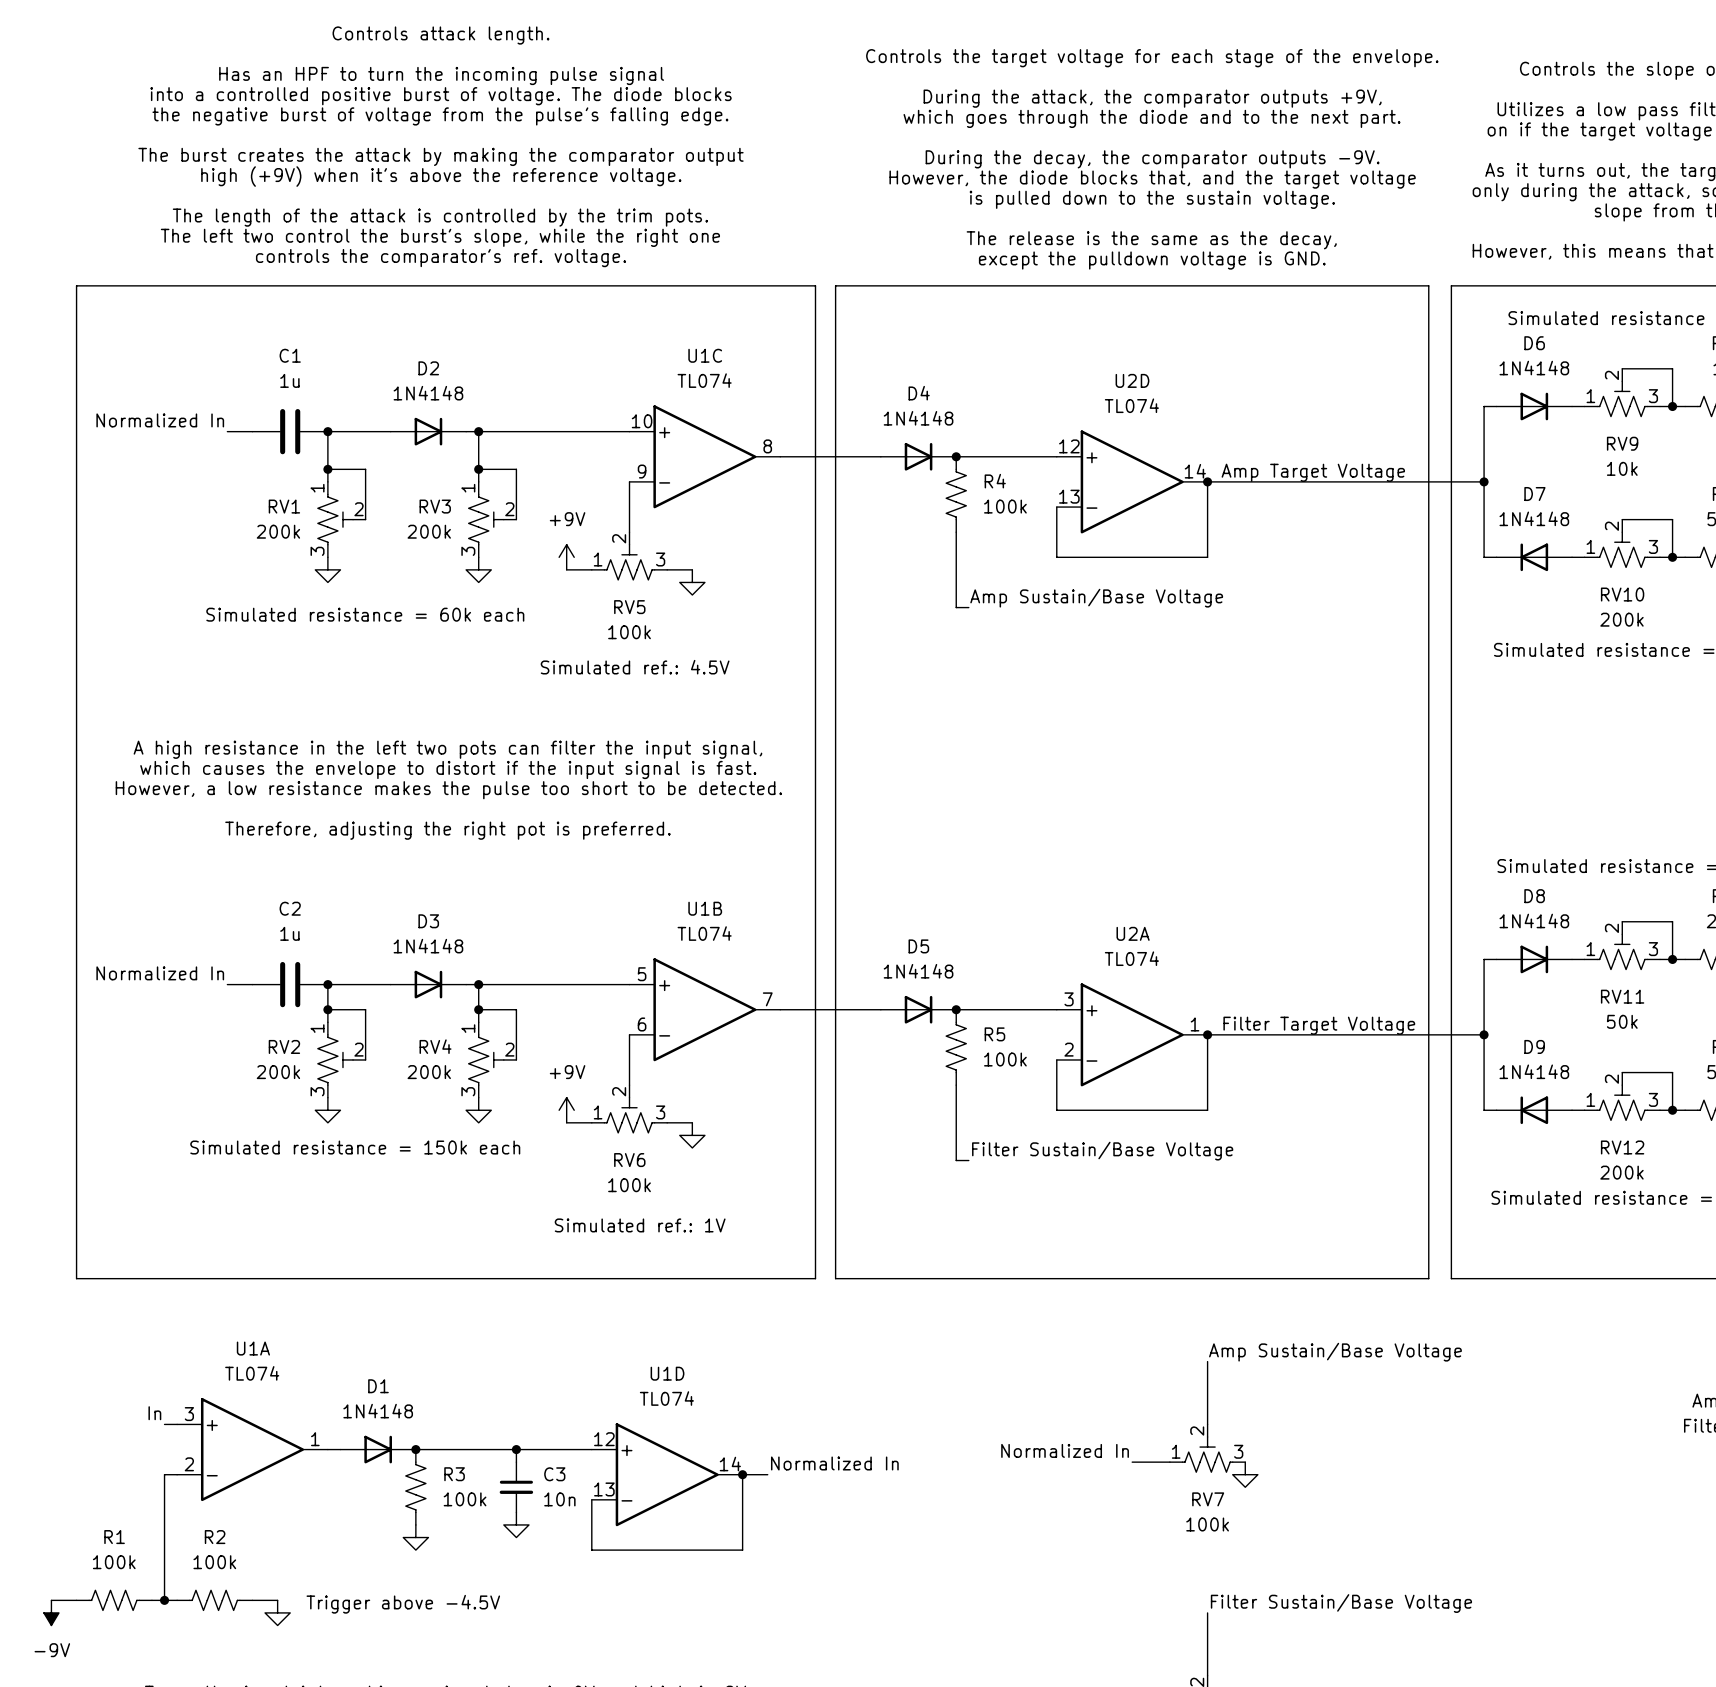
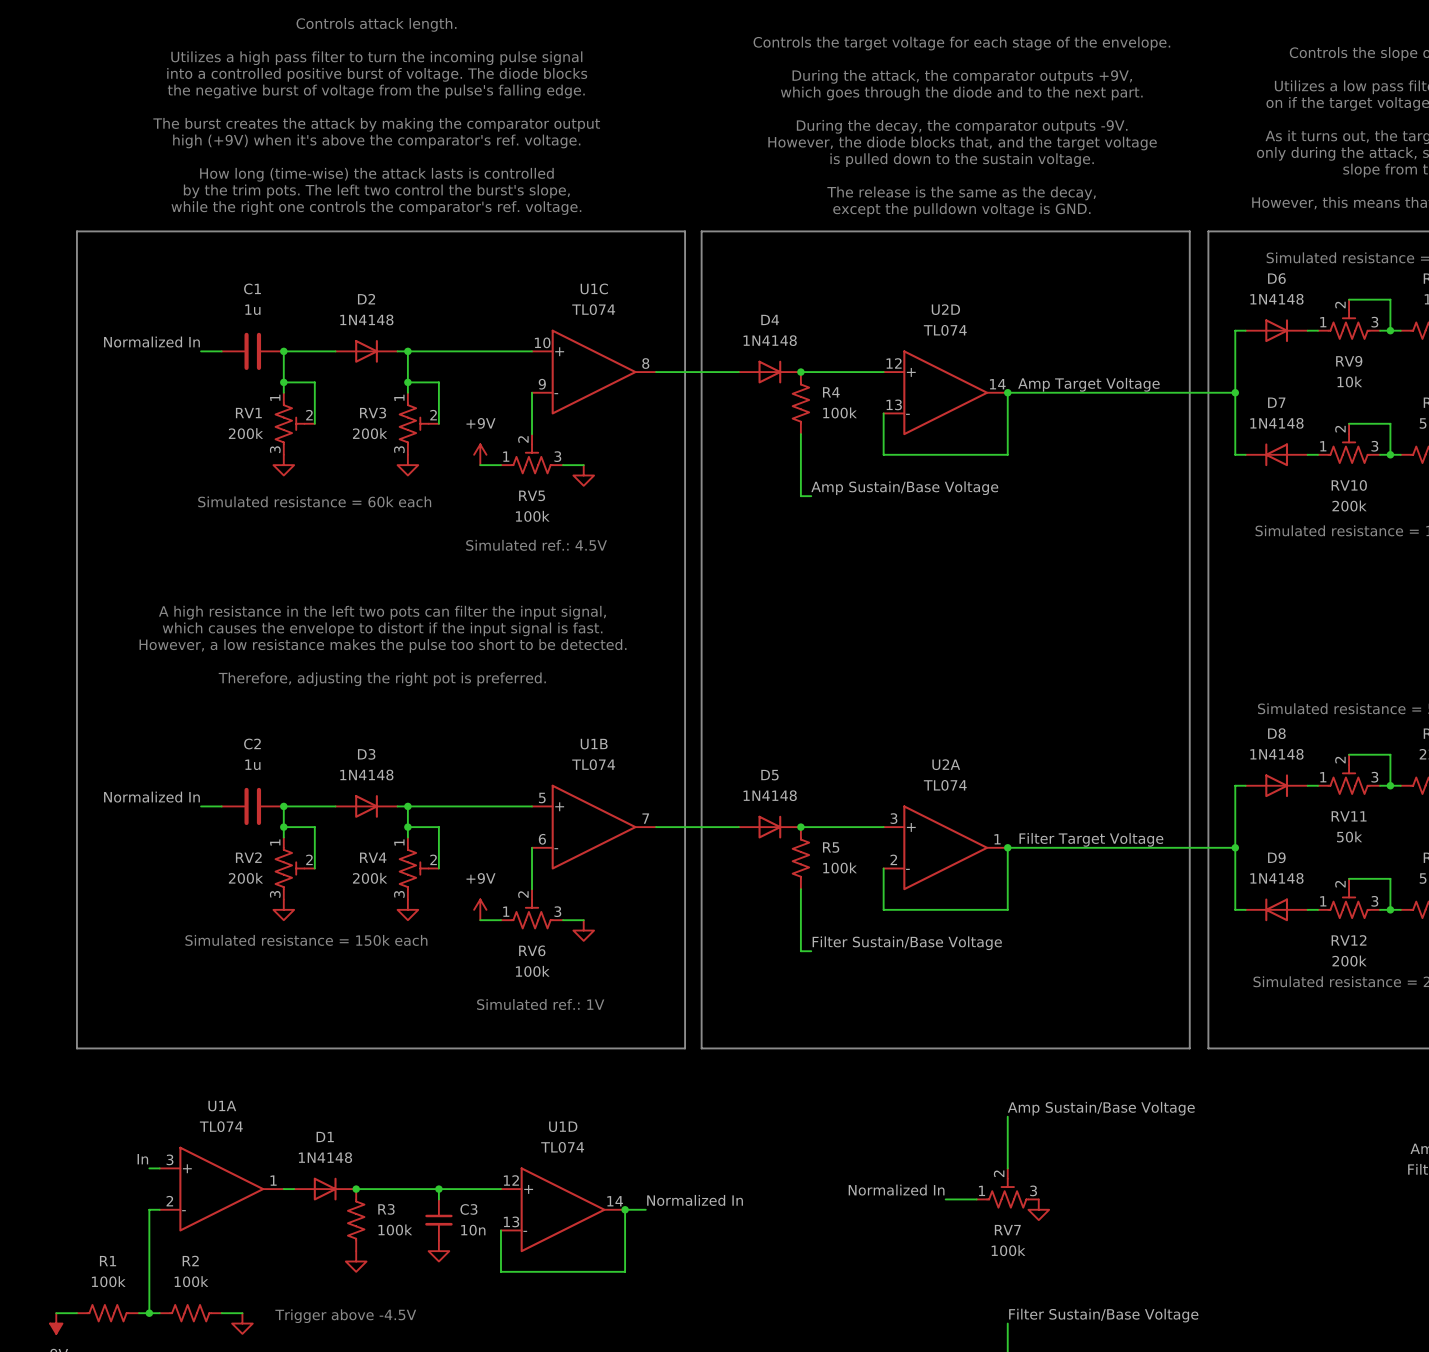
text: Has an HPF to turn the incoming pulse signal (441, 75) -> Utilizes a high pass filter to turn the incoming pulse signal (376, 58)
text: high (+9V) when it's above the reference voltage. (441, 176) -> high (+9V) when it's above the comparator's ref. voltage. (376, 141)
text: The length of the attack is controlled by the trim pots. (440, 217) -> How long (time-wise) the attack lasts is controlled (376, 174)
text: The left two control the burst's slope, while the right one (440, 237) -> by the trim pots. The left two control the burst's slope, (376, 191)
text: controls the comparator's ref. voltage. (441, 258) -> while the right one controls the comparator's ref. voltage. (376, 208)

